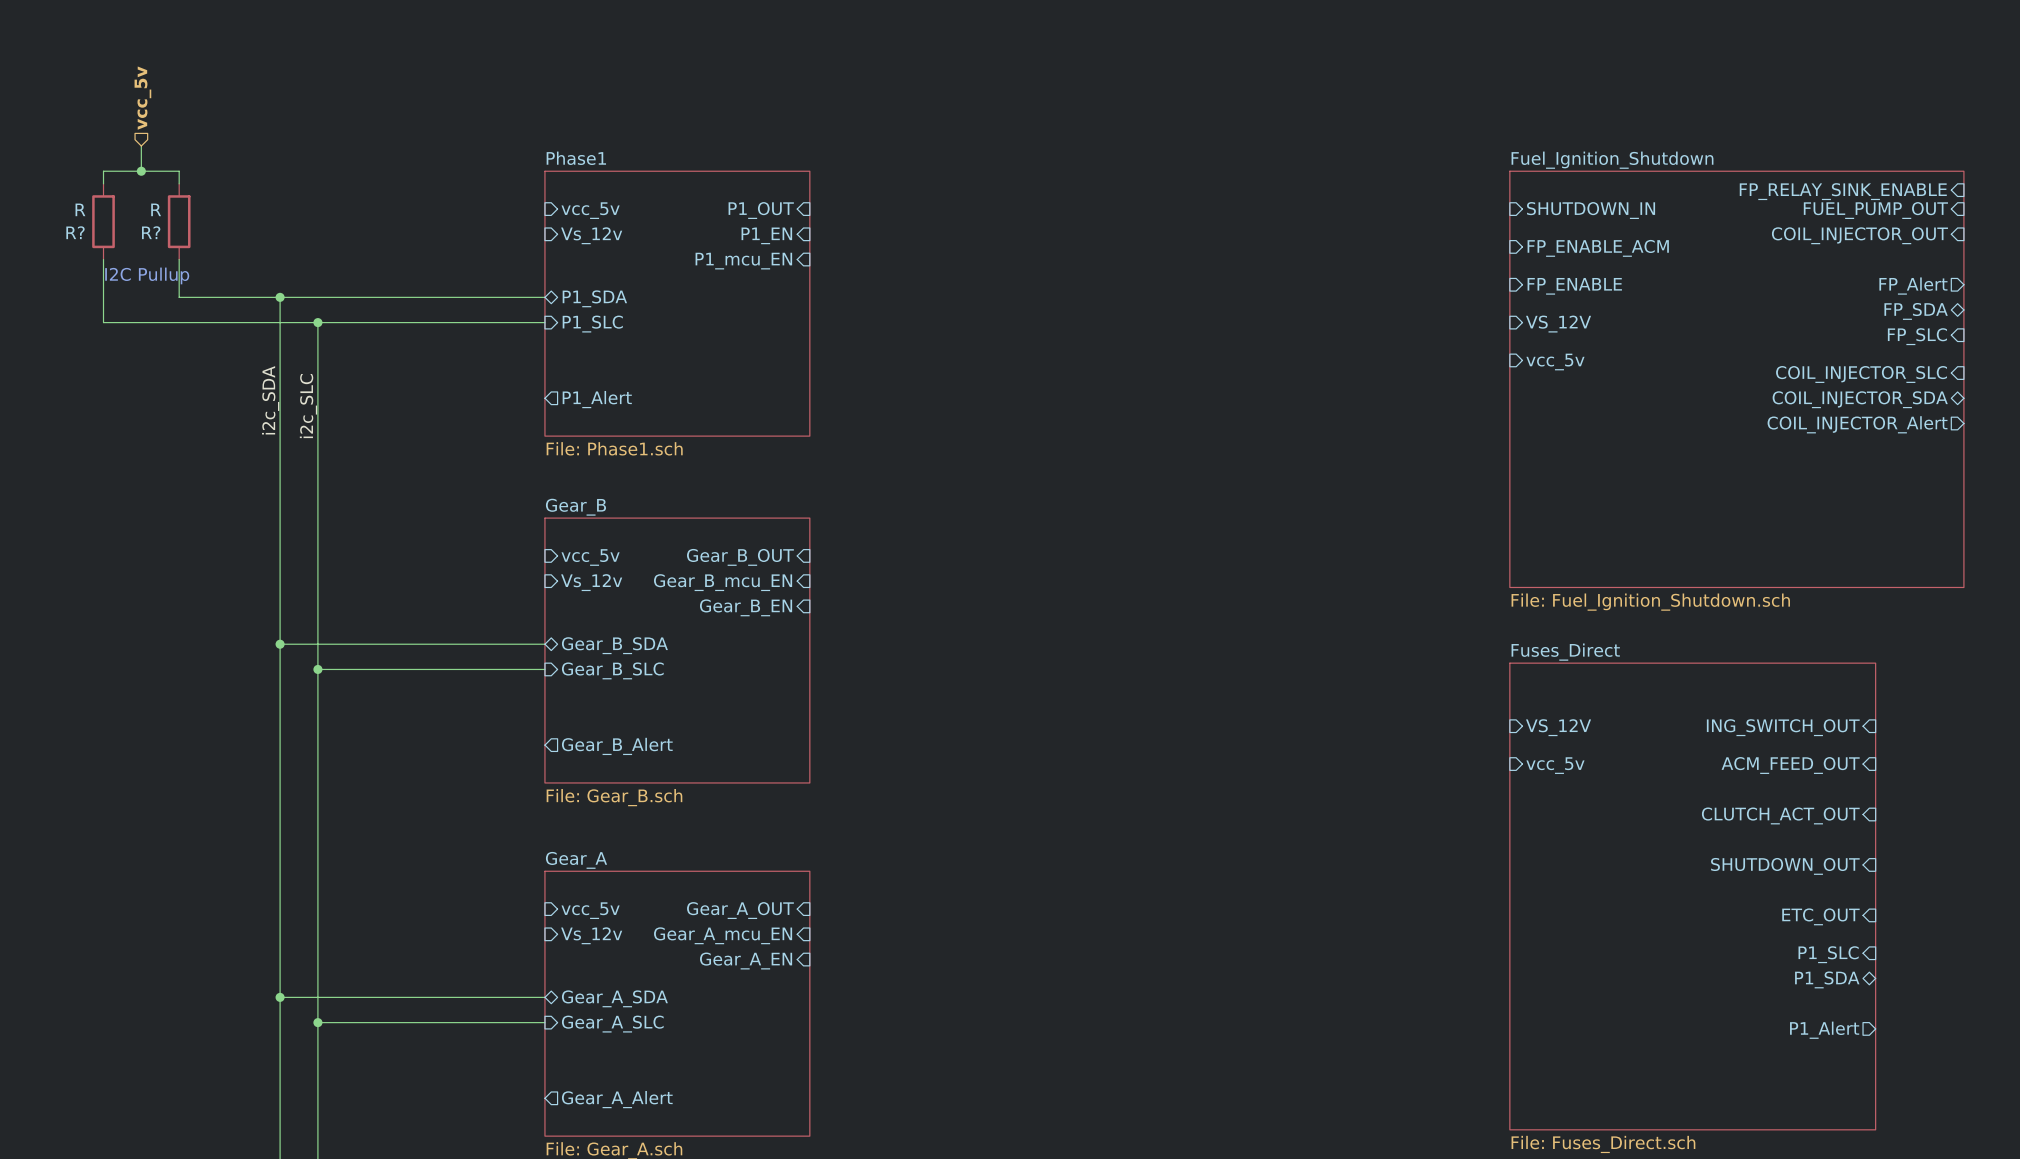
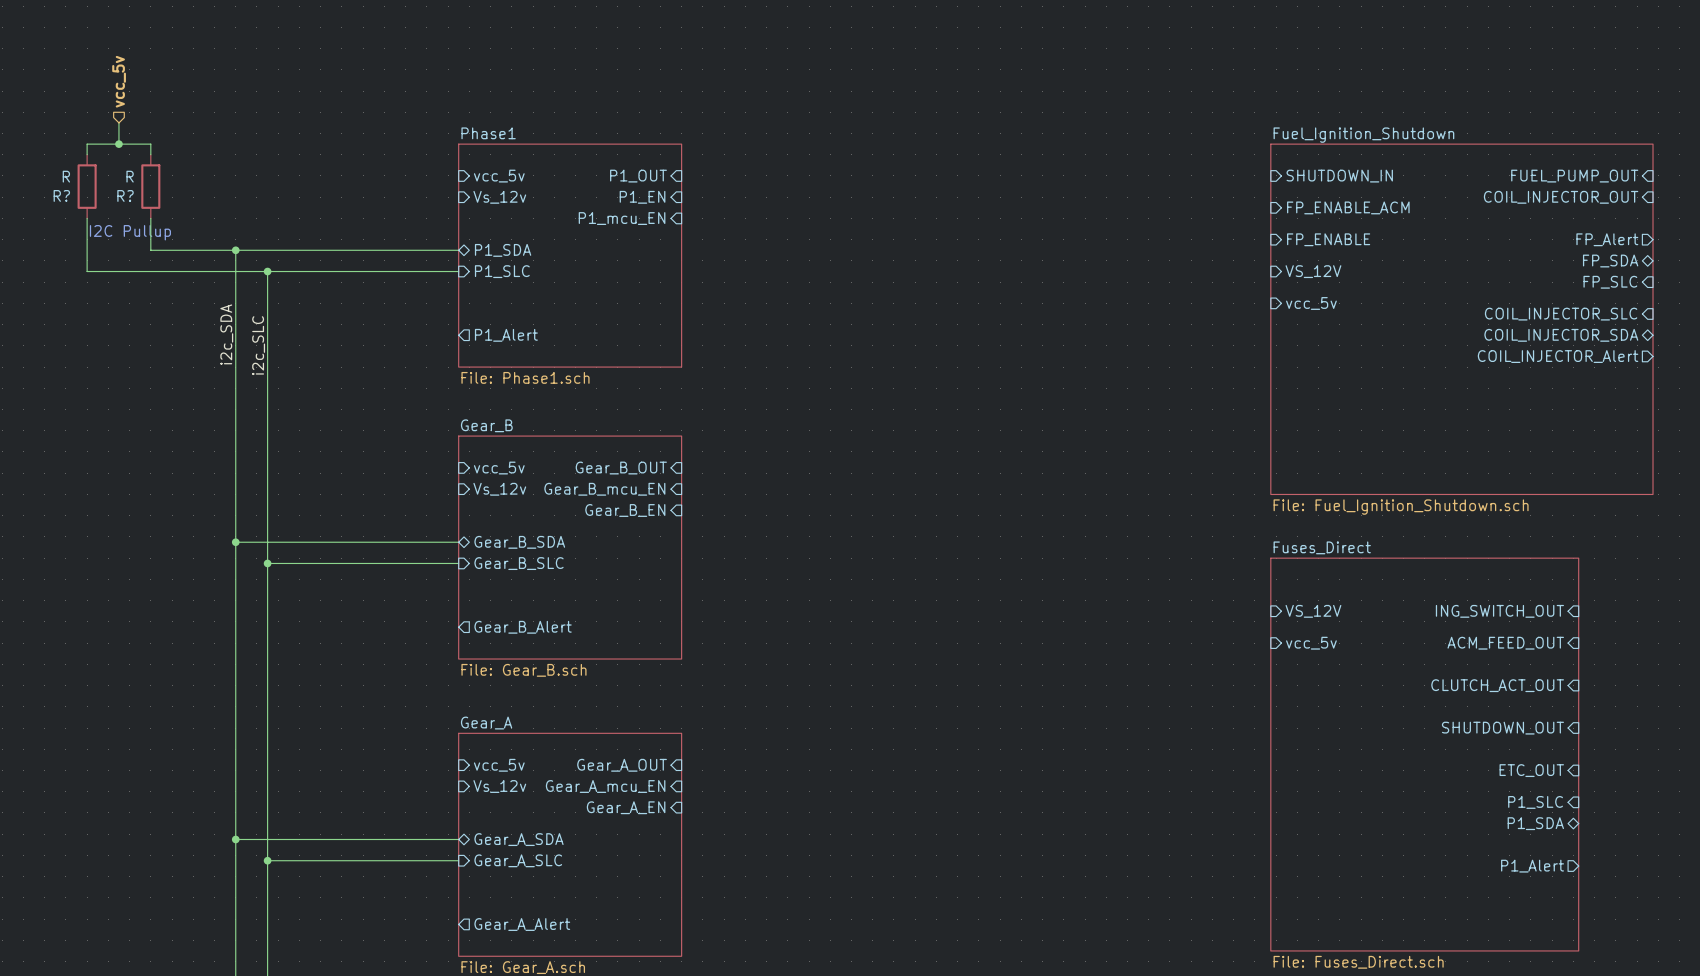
sheet pin: FP_RELAY_SINK_ENABLE (1843, 191) -> none

